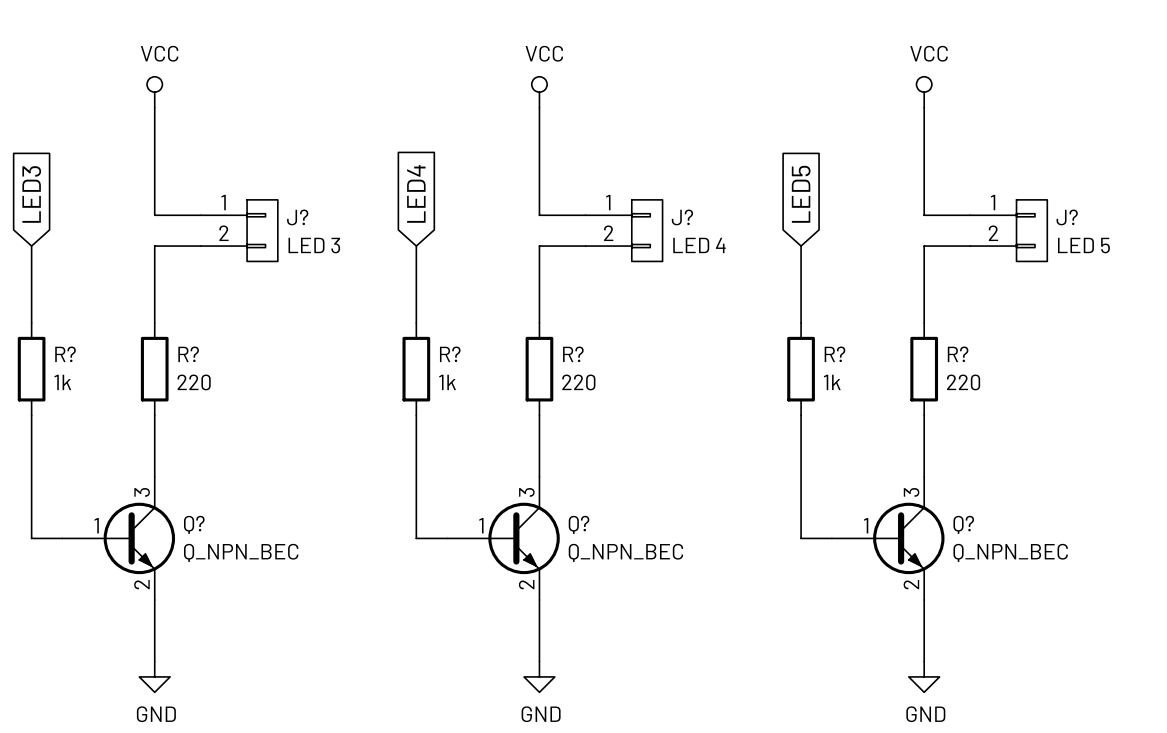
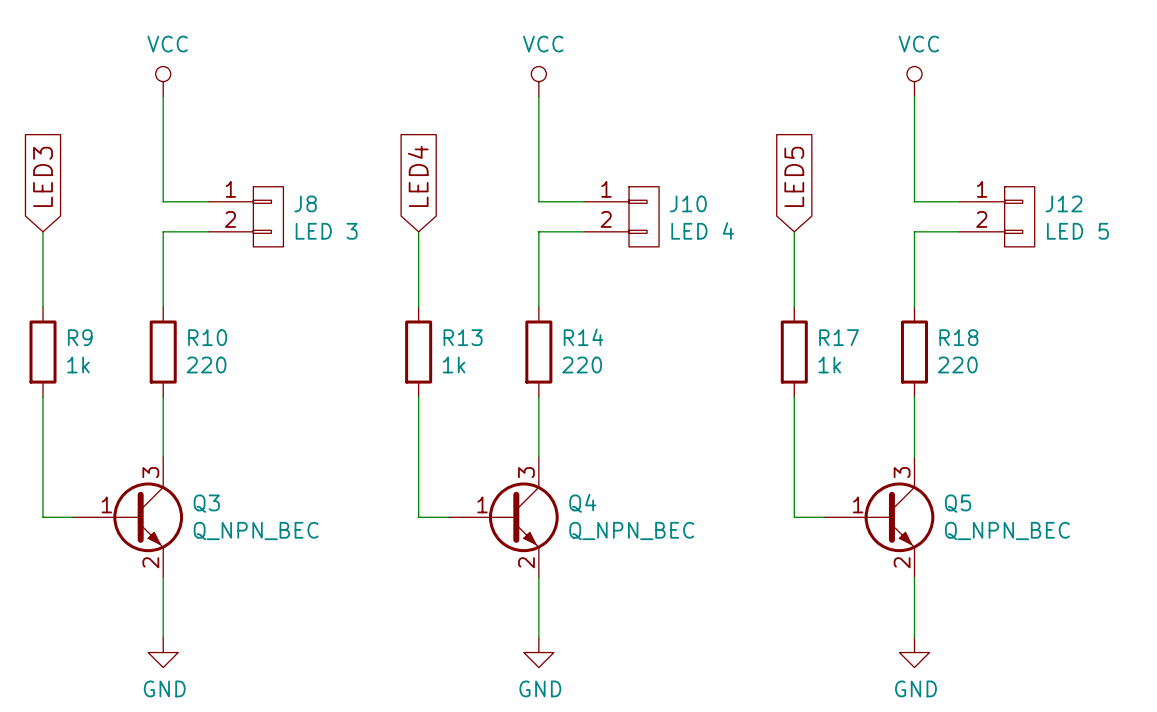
J? name: J? (297, 217) -> J8 (305, 203)
J? name: J? (682, 217) -> J10 (688, 203)
J? name: J? (1067, 217) -> J12 (1063, 203)
R? name: R? (65, 354) -> R9 (80, 337)
R? name: R? (188, 354) -> R10 (207, 337)
R? name: R? (450, 354) -> R13 (463, 337)
R? name: R? (573, 354) -> R14 (583, 337)
R? name: R? (834, 354) -> R17 (839, 337)
R? name: R? (958, 354) -> R18 (958, 337)
Q? name: Q? (194, 524) -> Q3 (206, 503)
Q? name: Q? (579, 524) -> Q4 (582, 503)
Q? name: Q? (963, 524) -> Q5 (958, 503)

